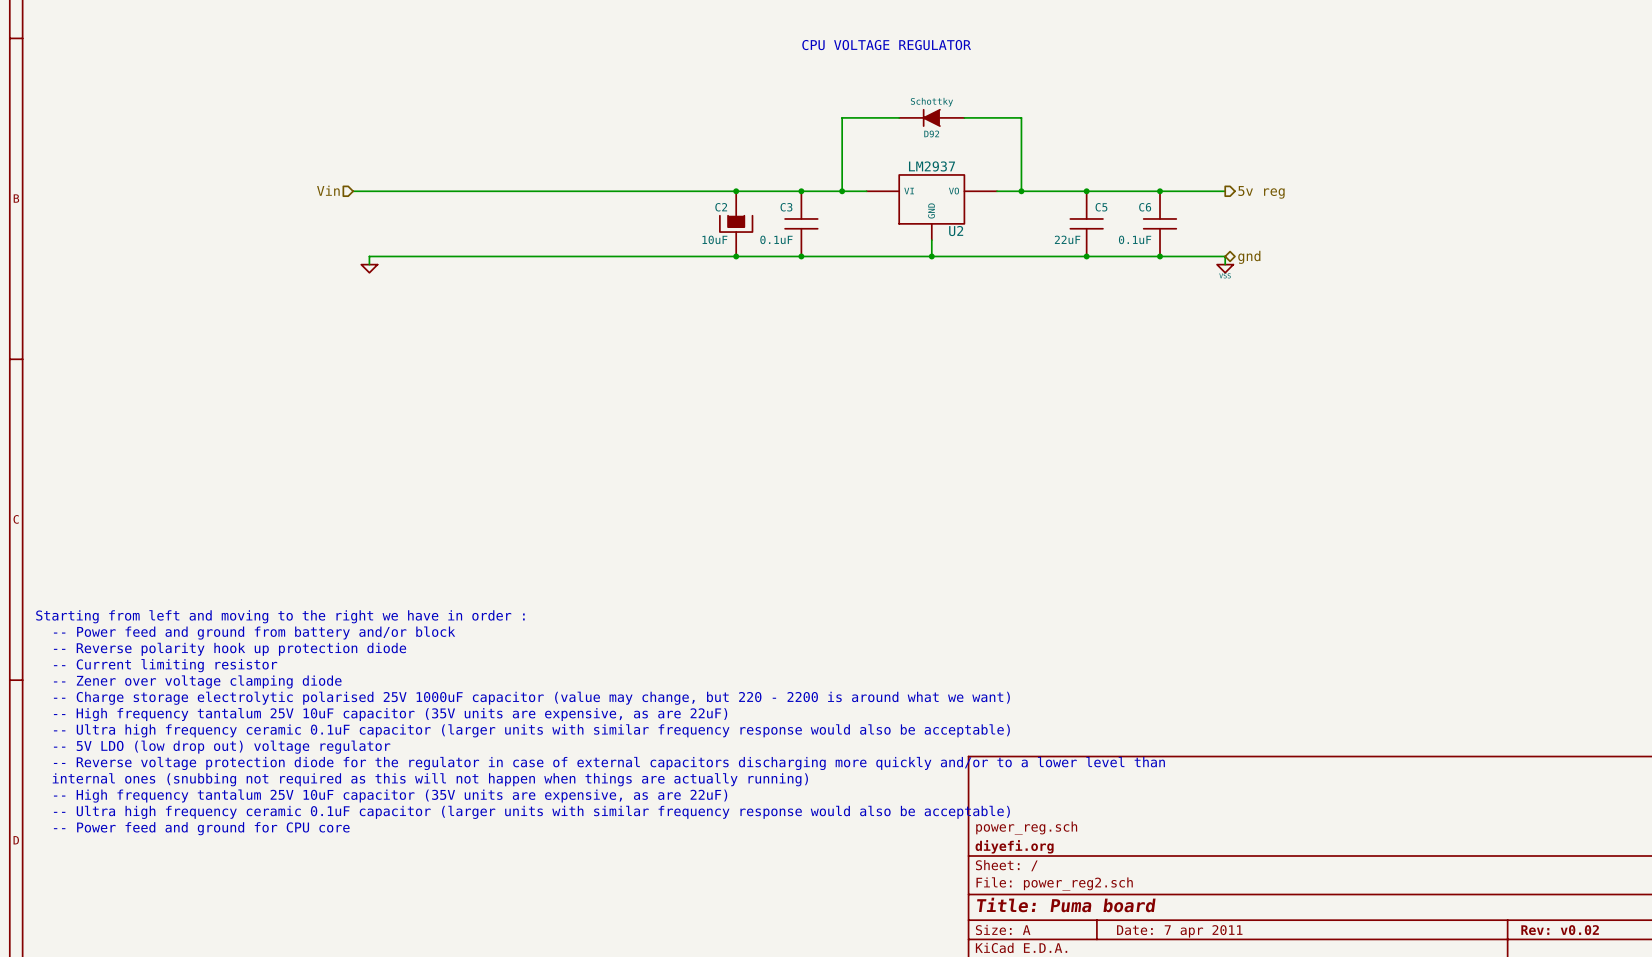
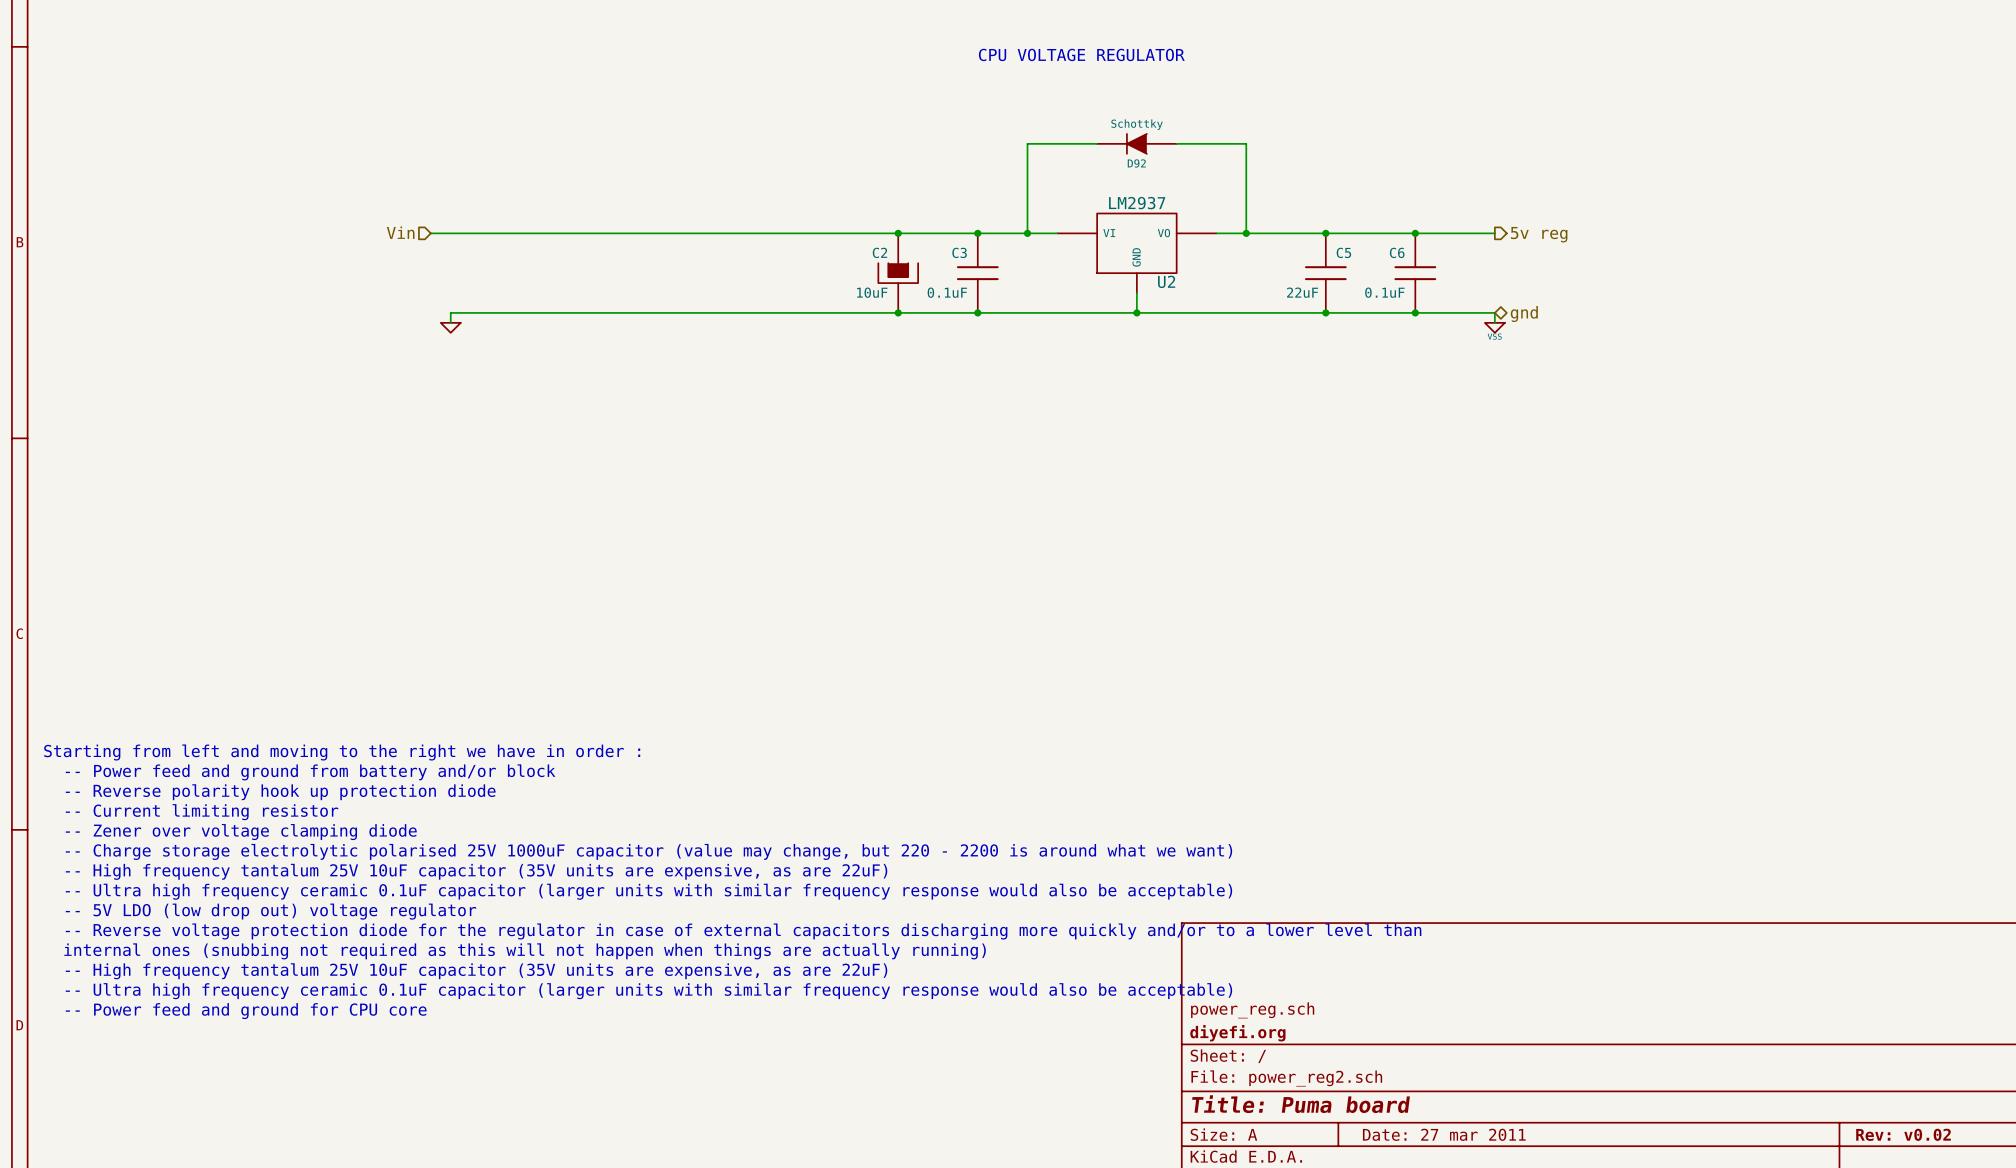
title block: Date: 7 apr 2011 (1179, 931) -> Date: 27 mar 2011 (1444, 1134)

